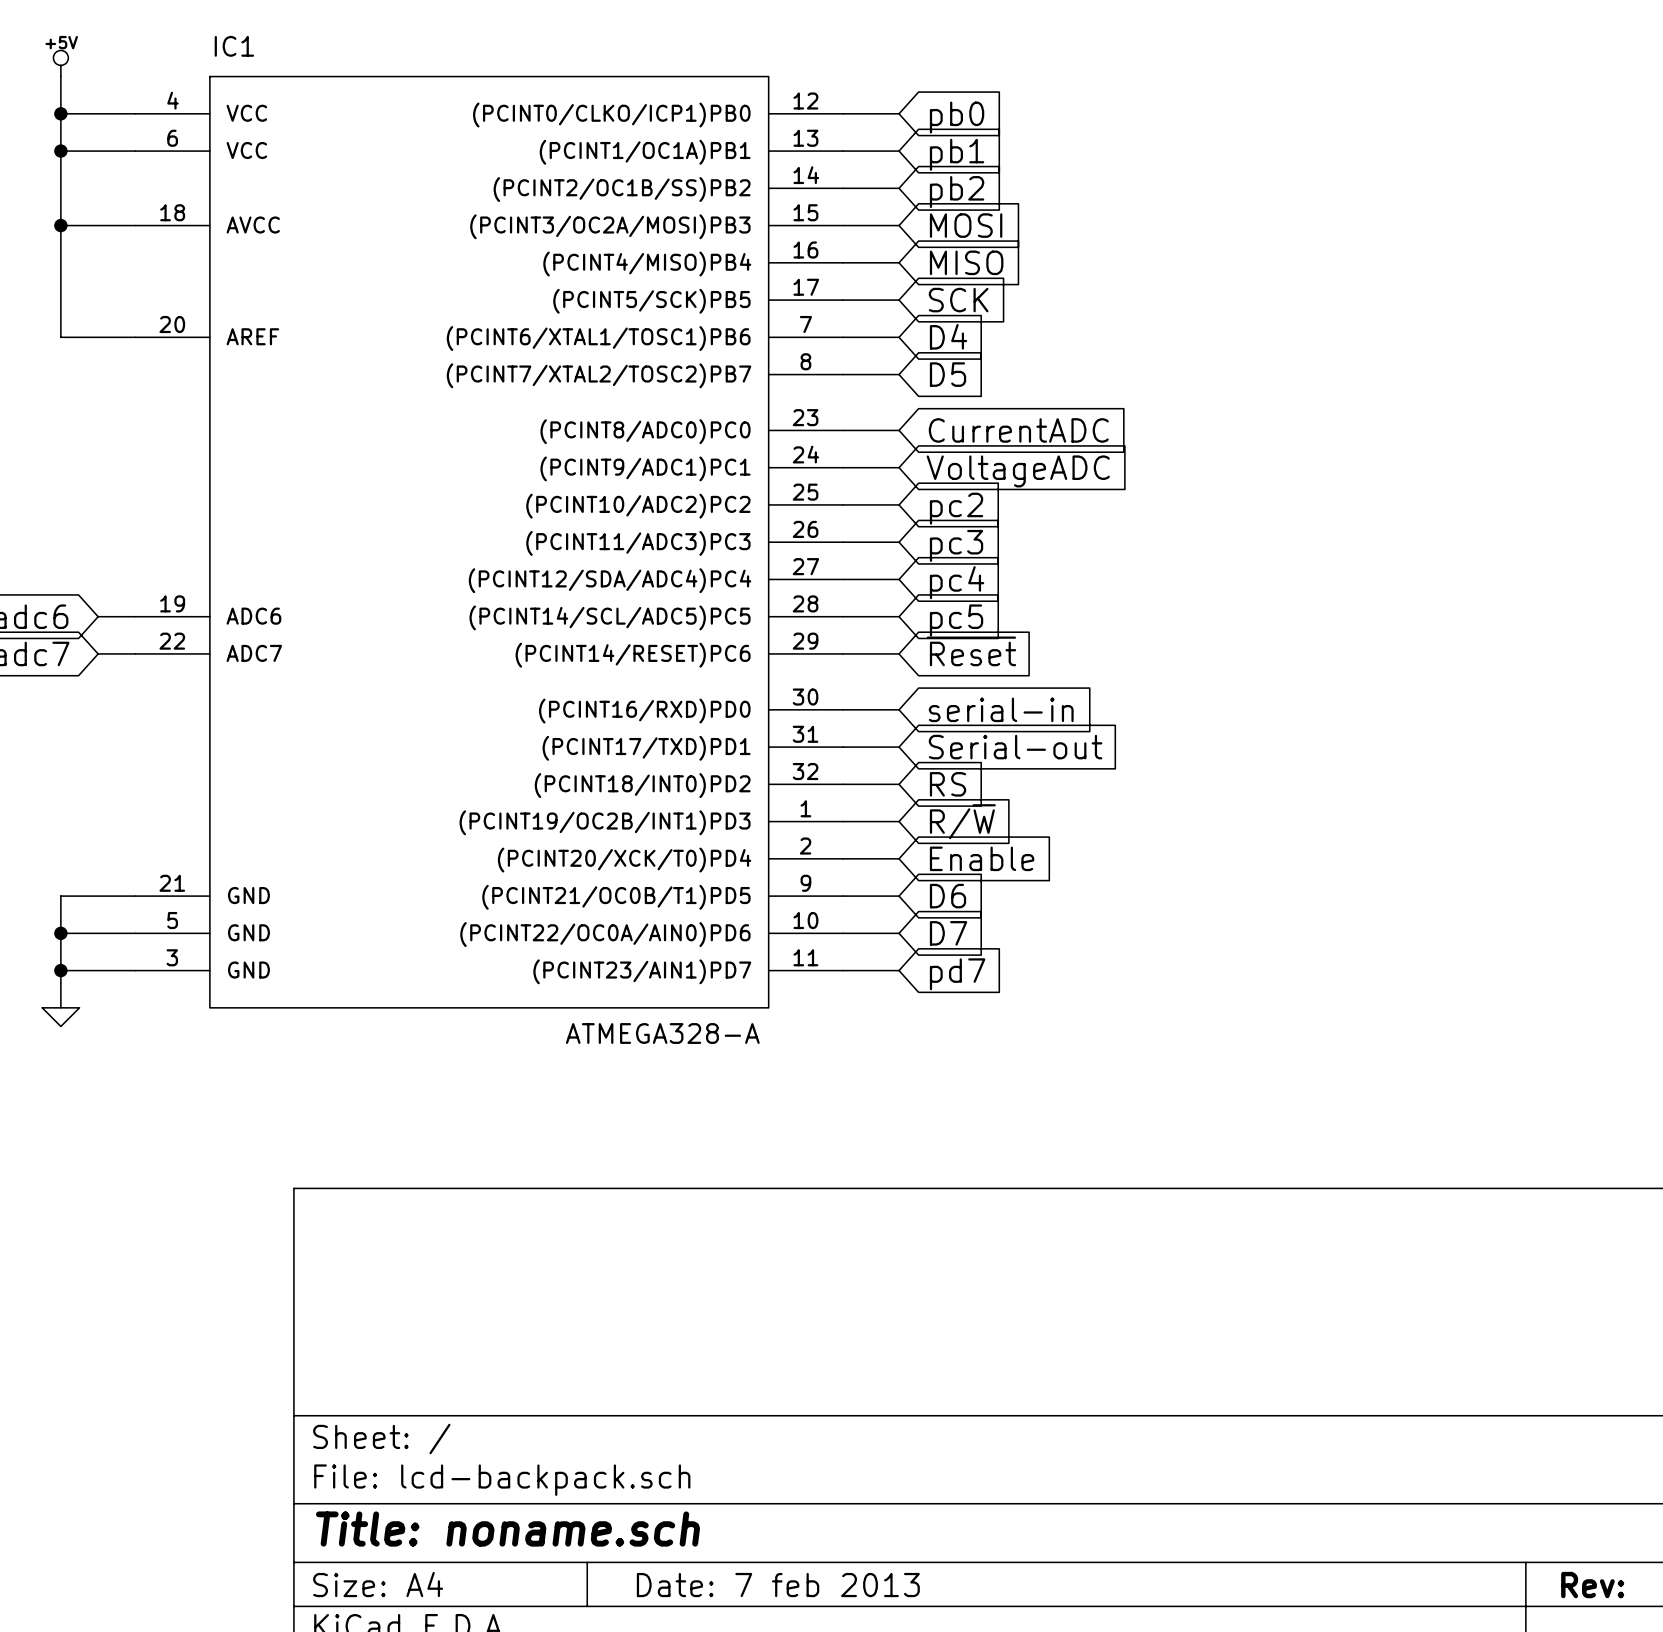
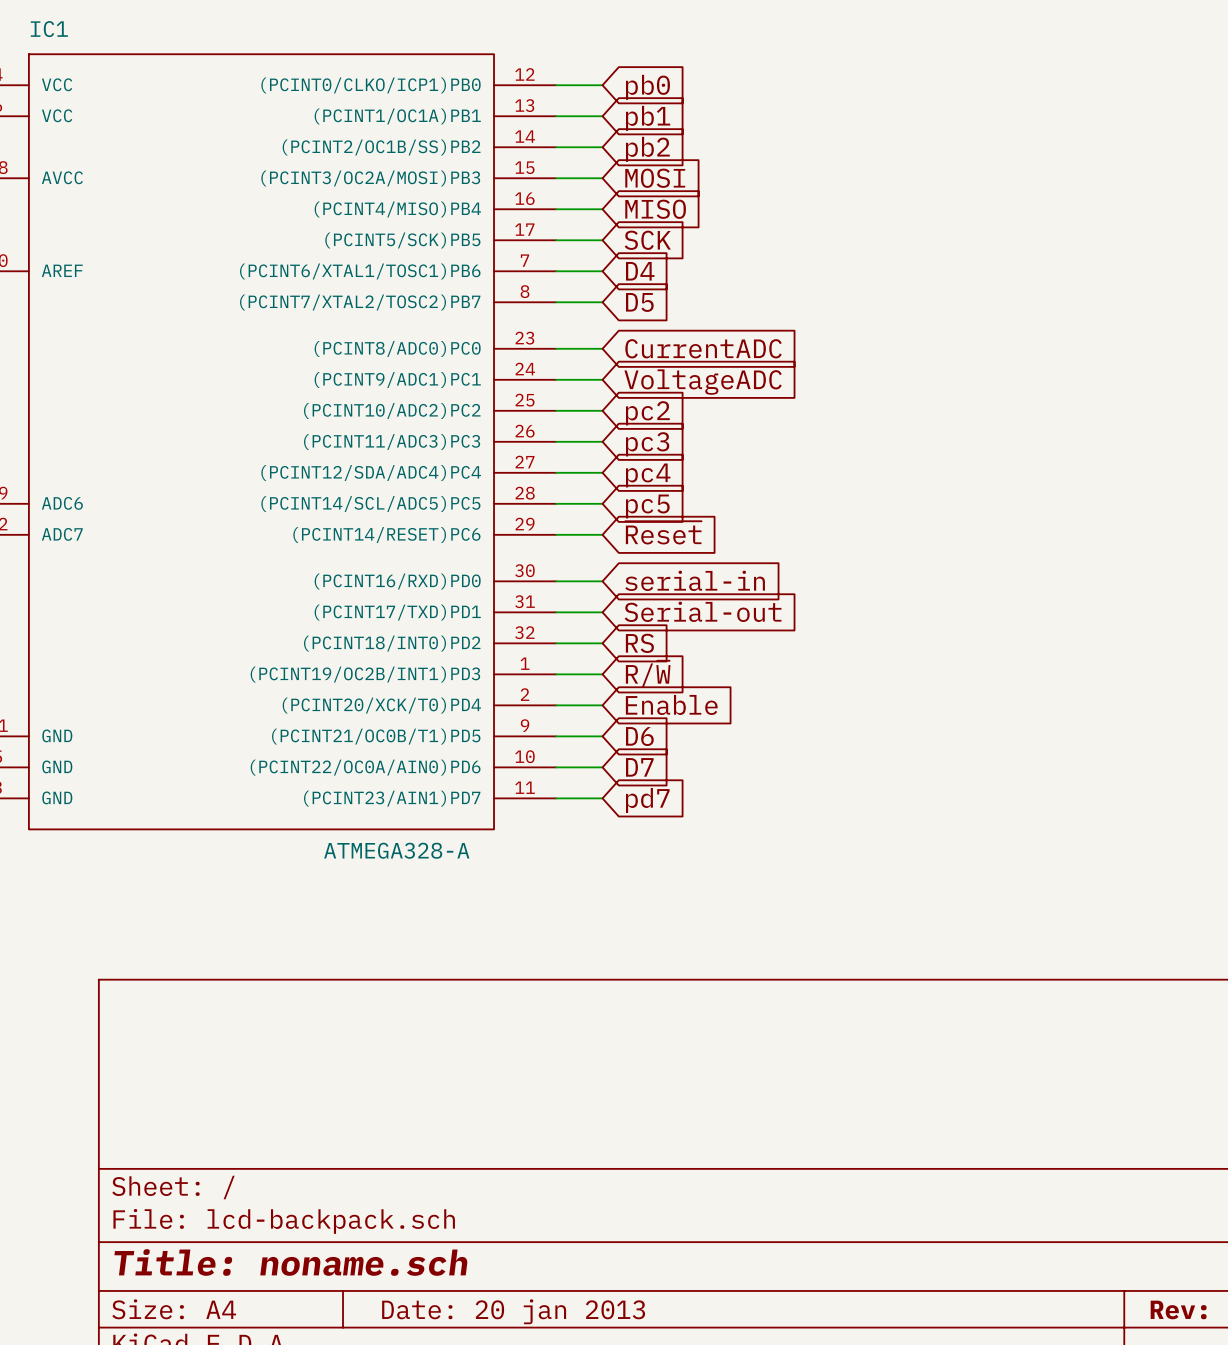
title block: Date: 7 feb 2013 (778, 1585) -> Date: 20 jan 2013 (513, 1311)

